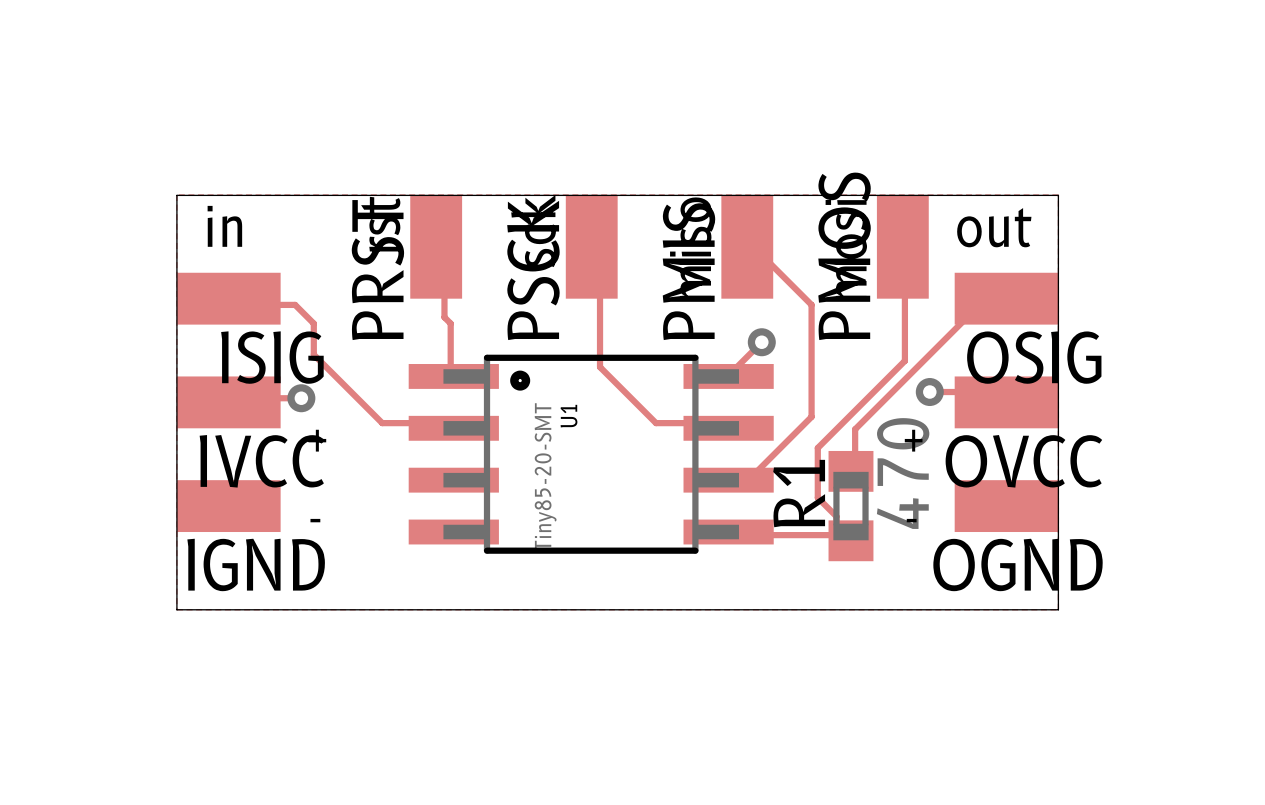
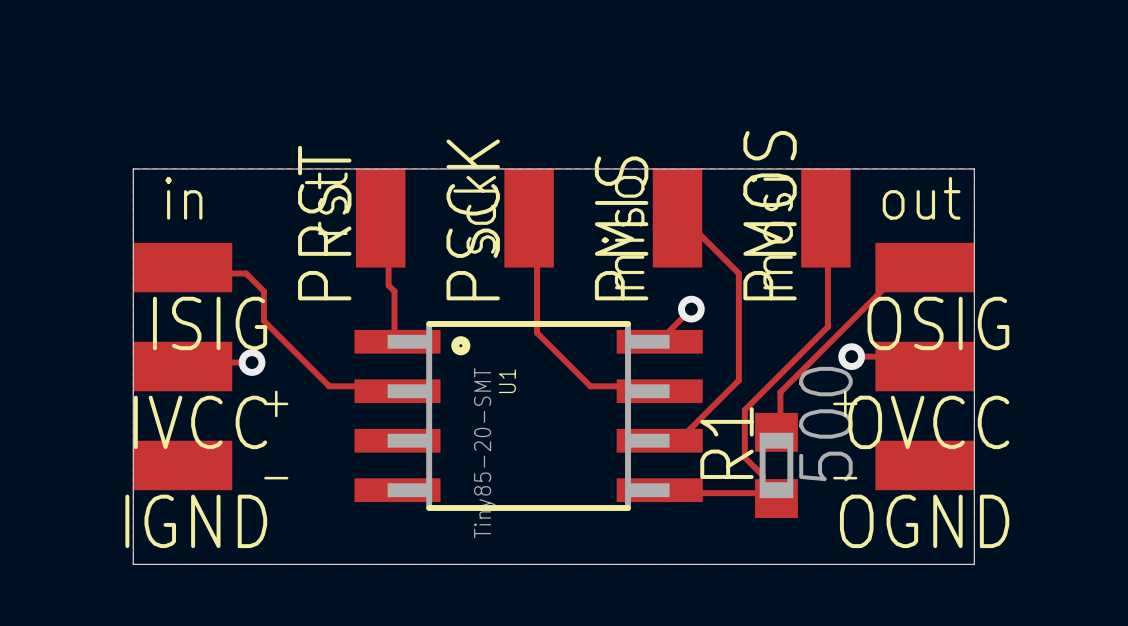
R1 value: 470 (903, 473) -> 500 (825, 423)

